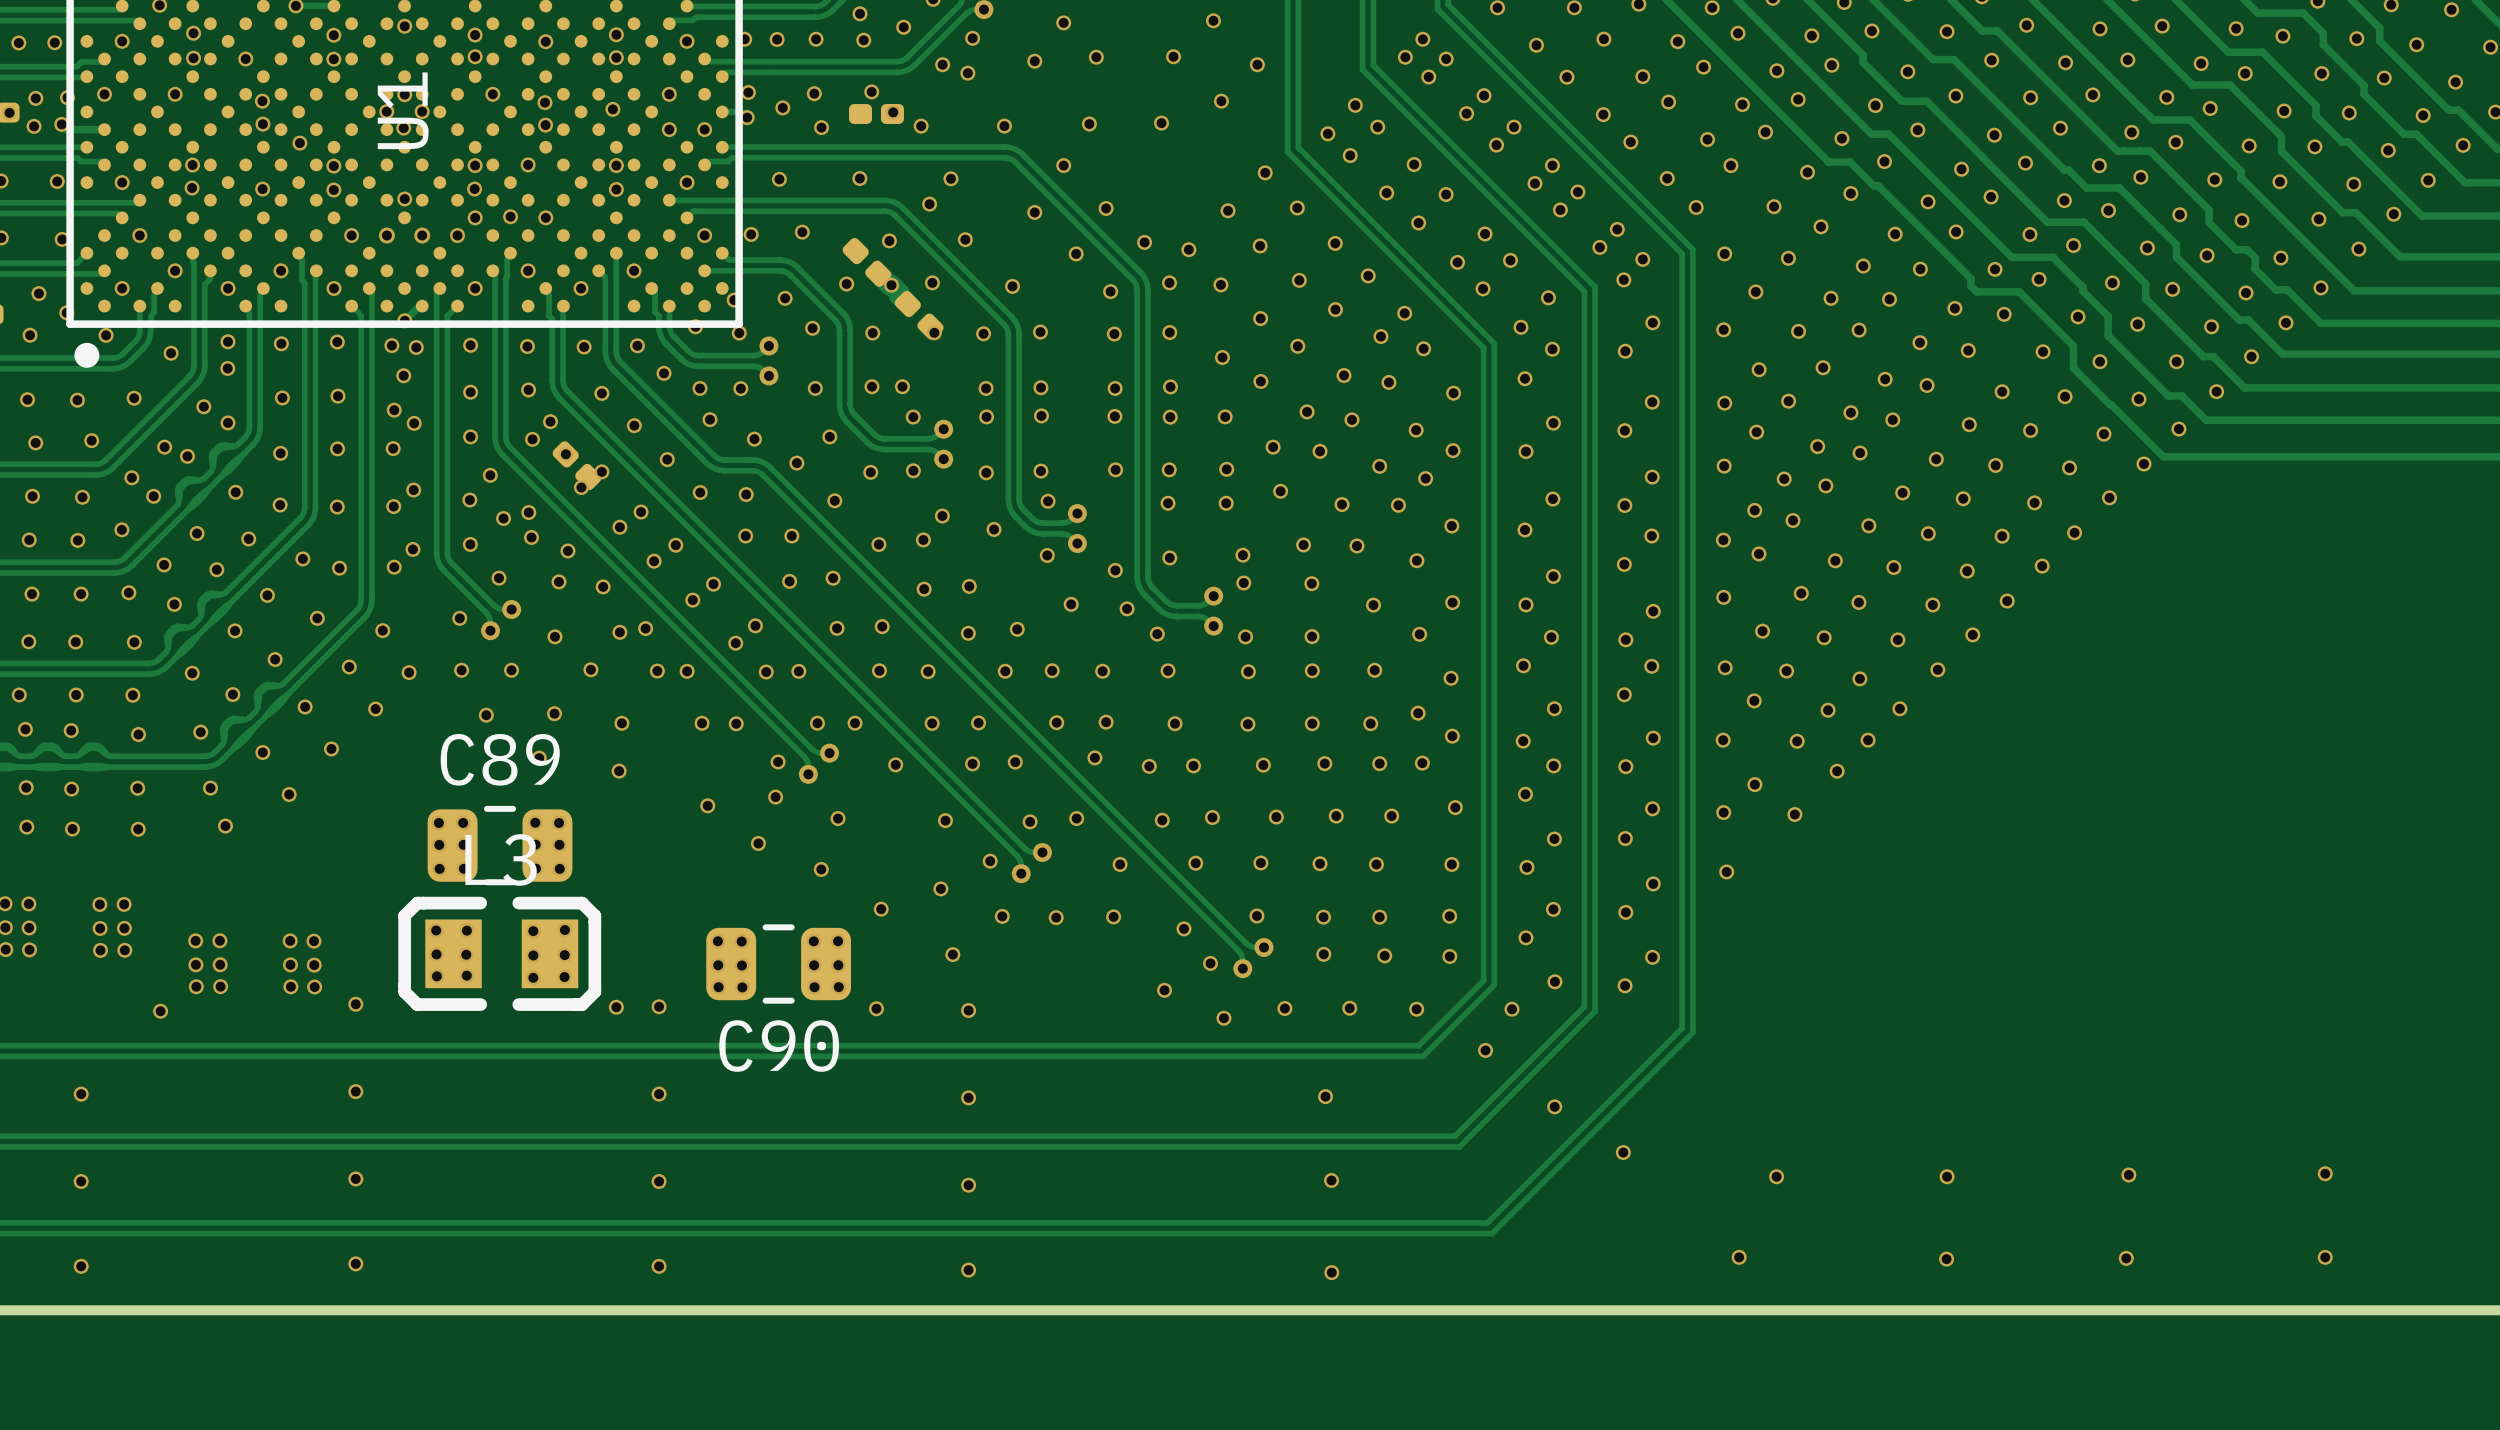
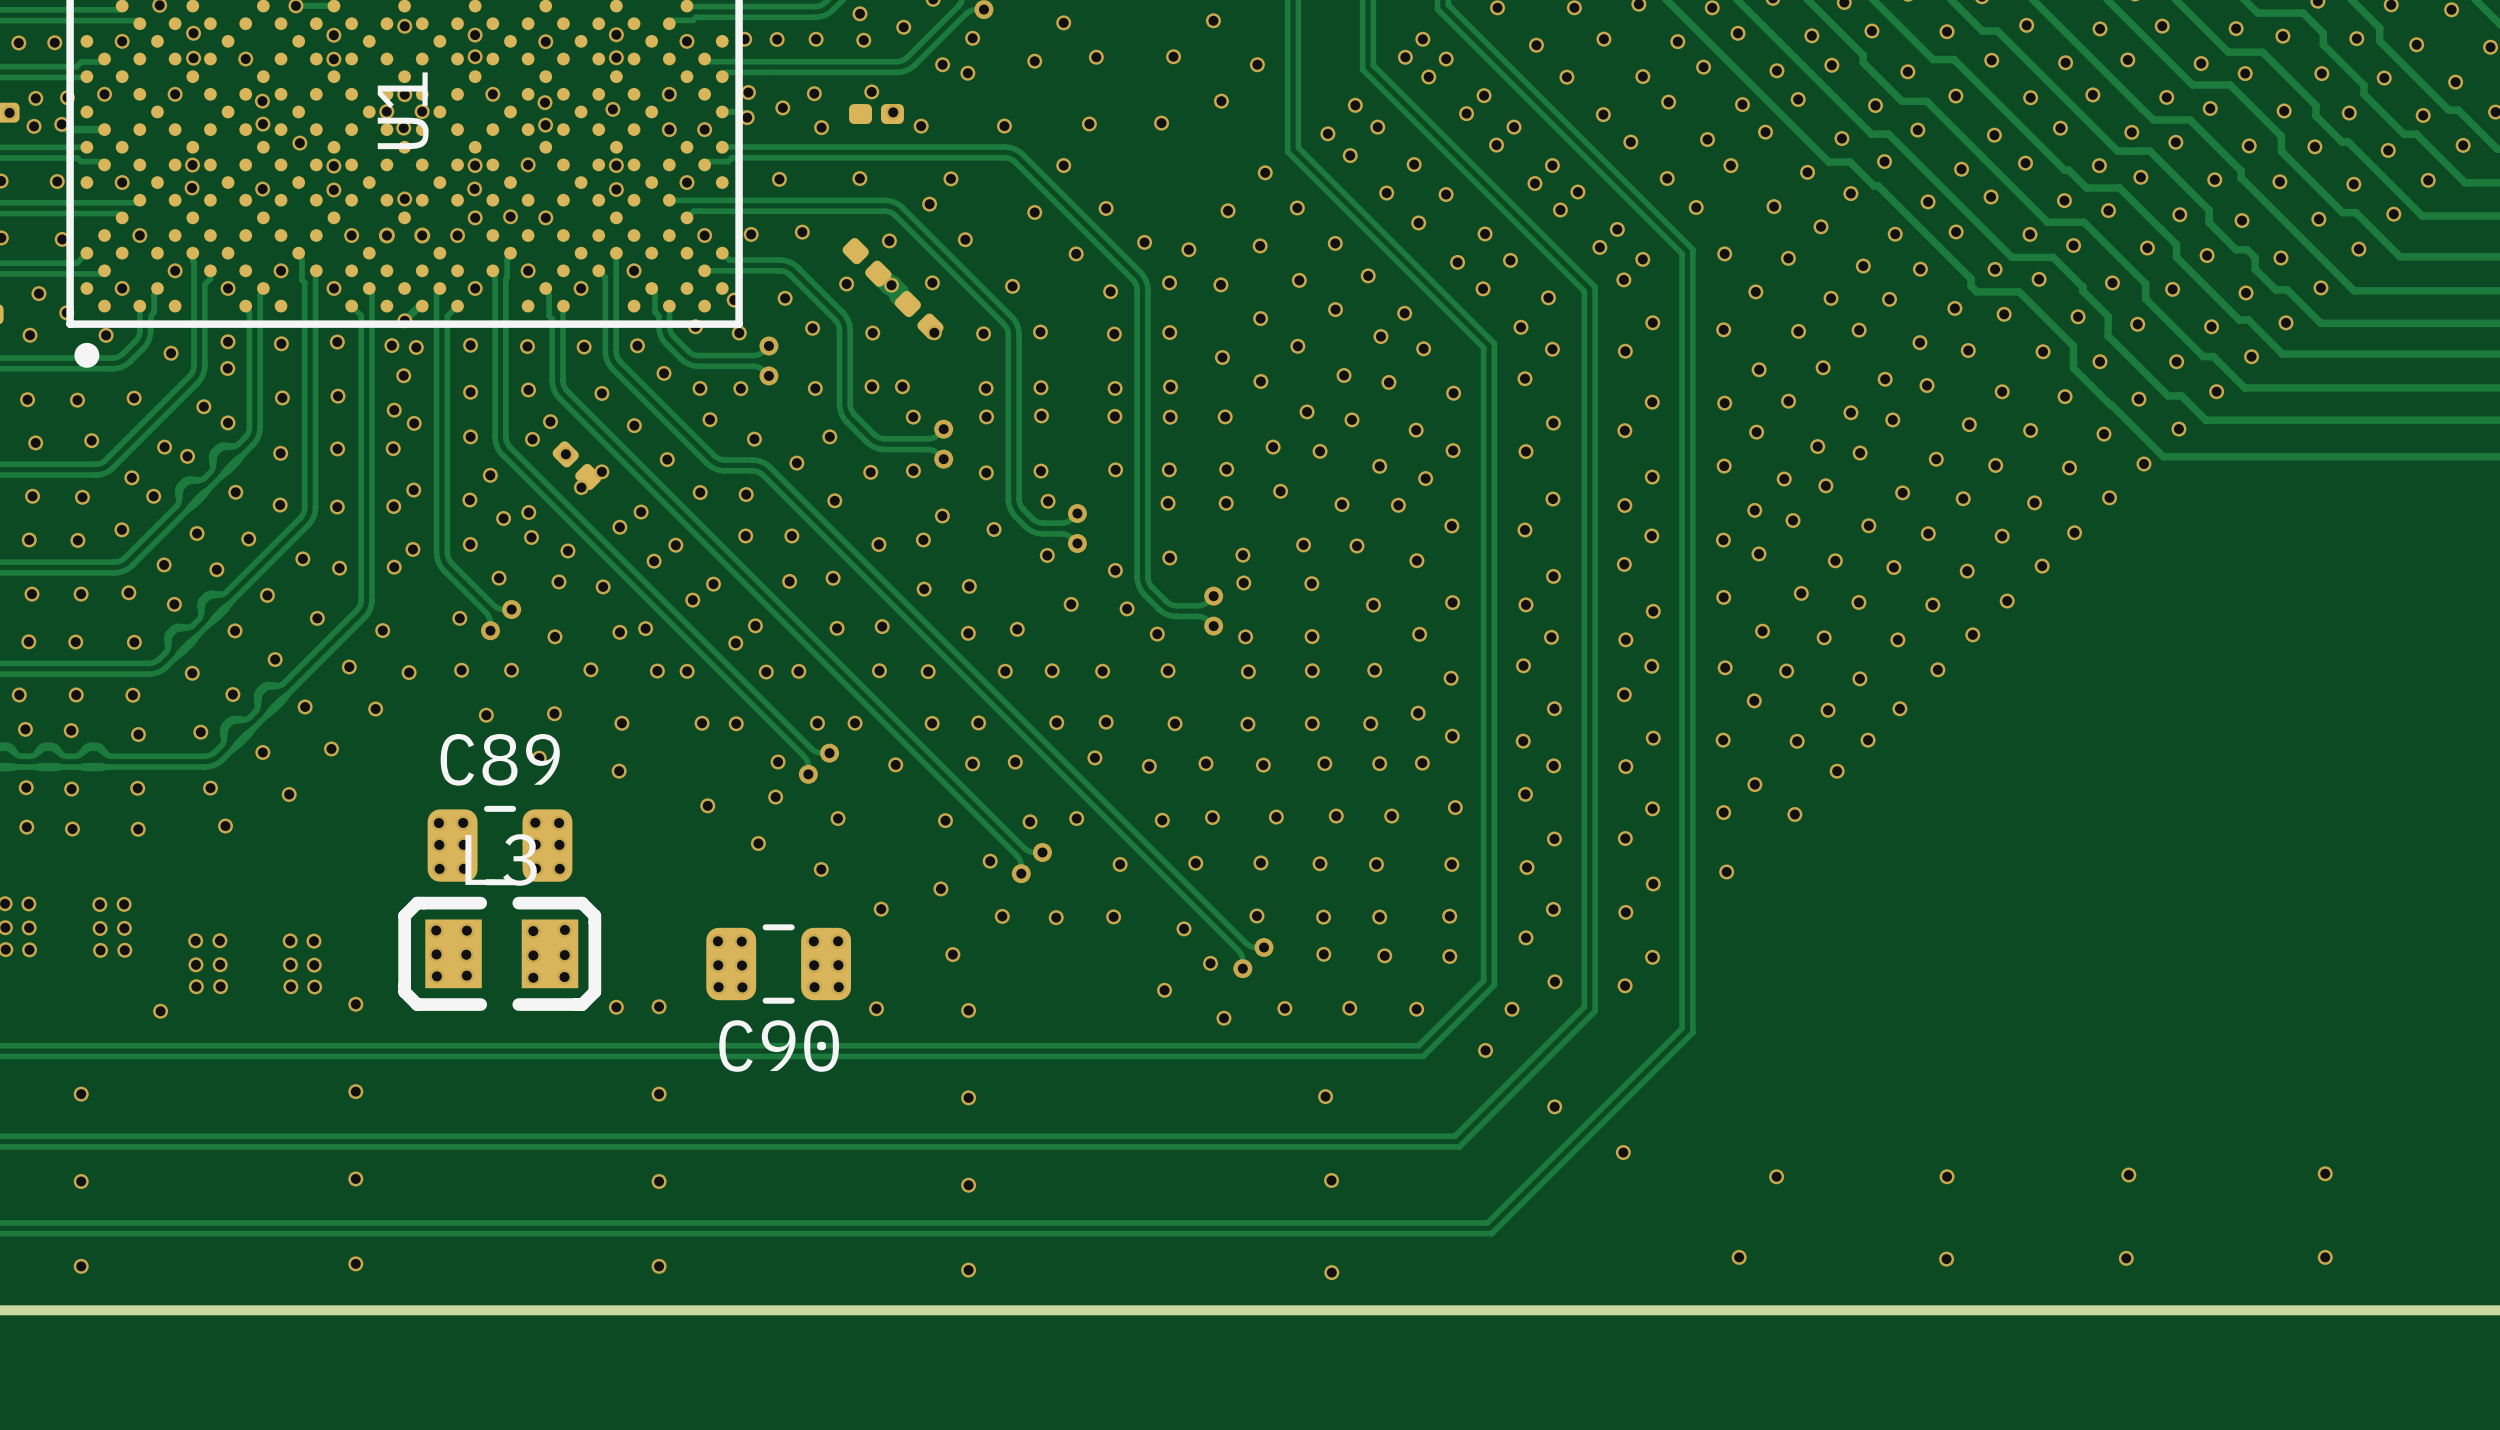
via position: (1193, 765) -> (1205, 763)

